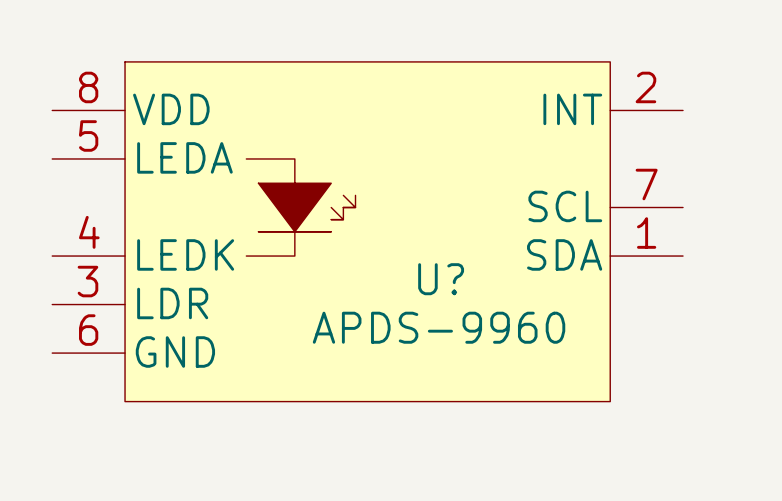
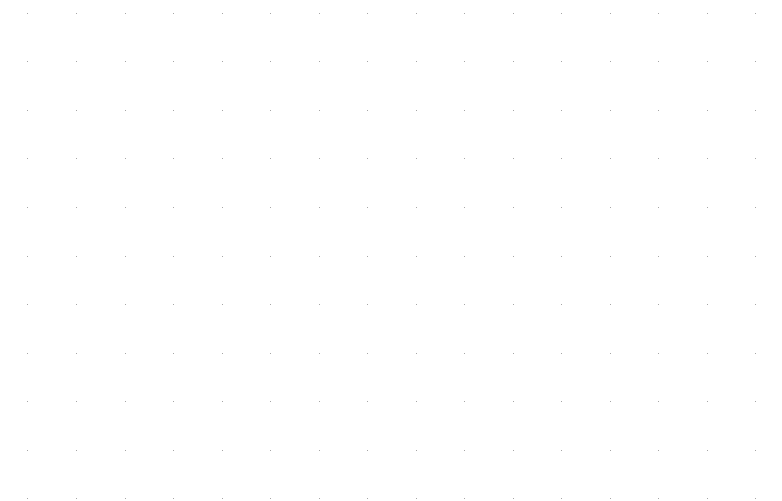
U?: APDS-9960 (367, 231) -> none

